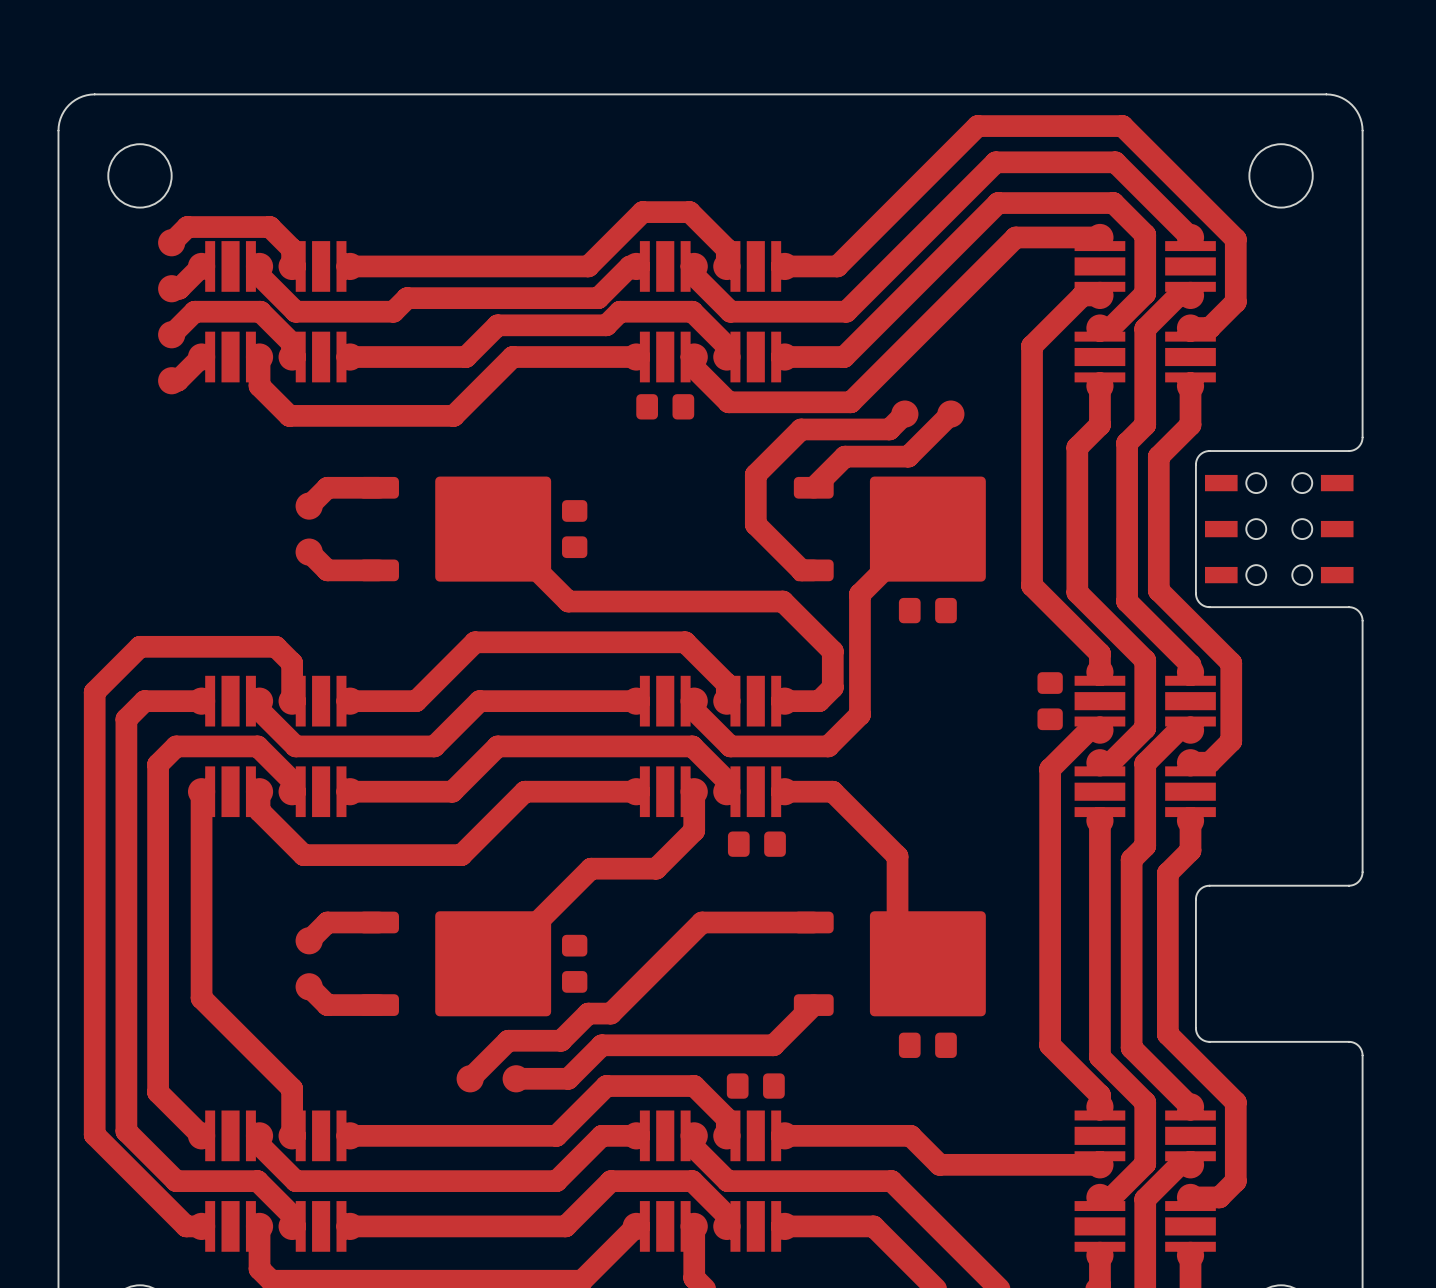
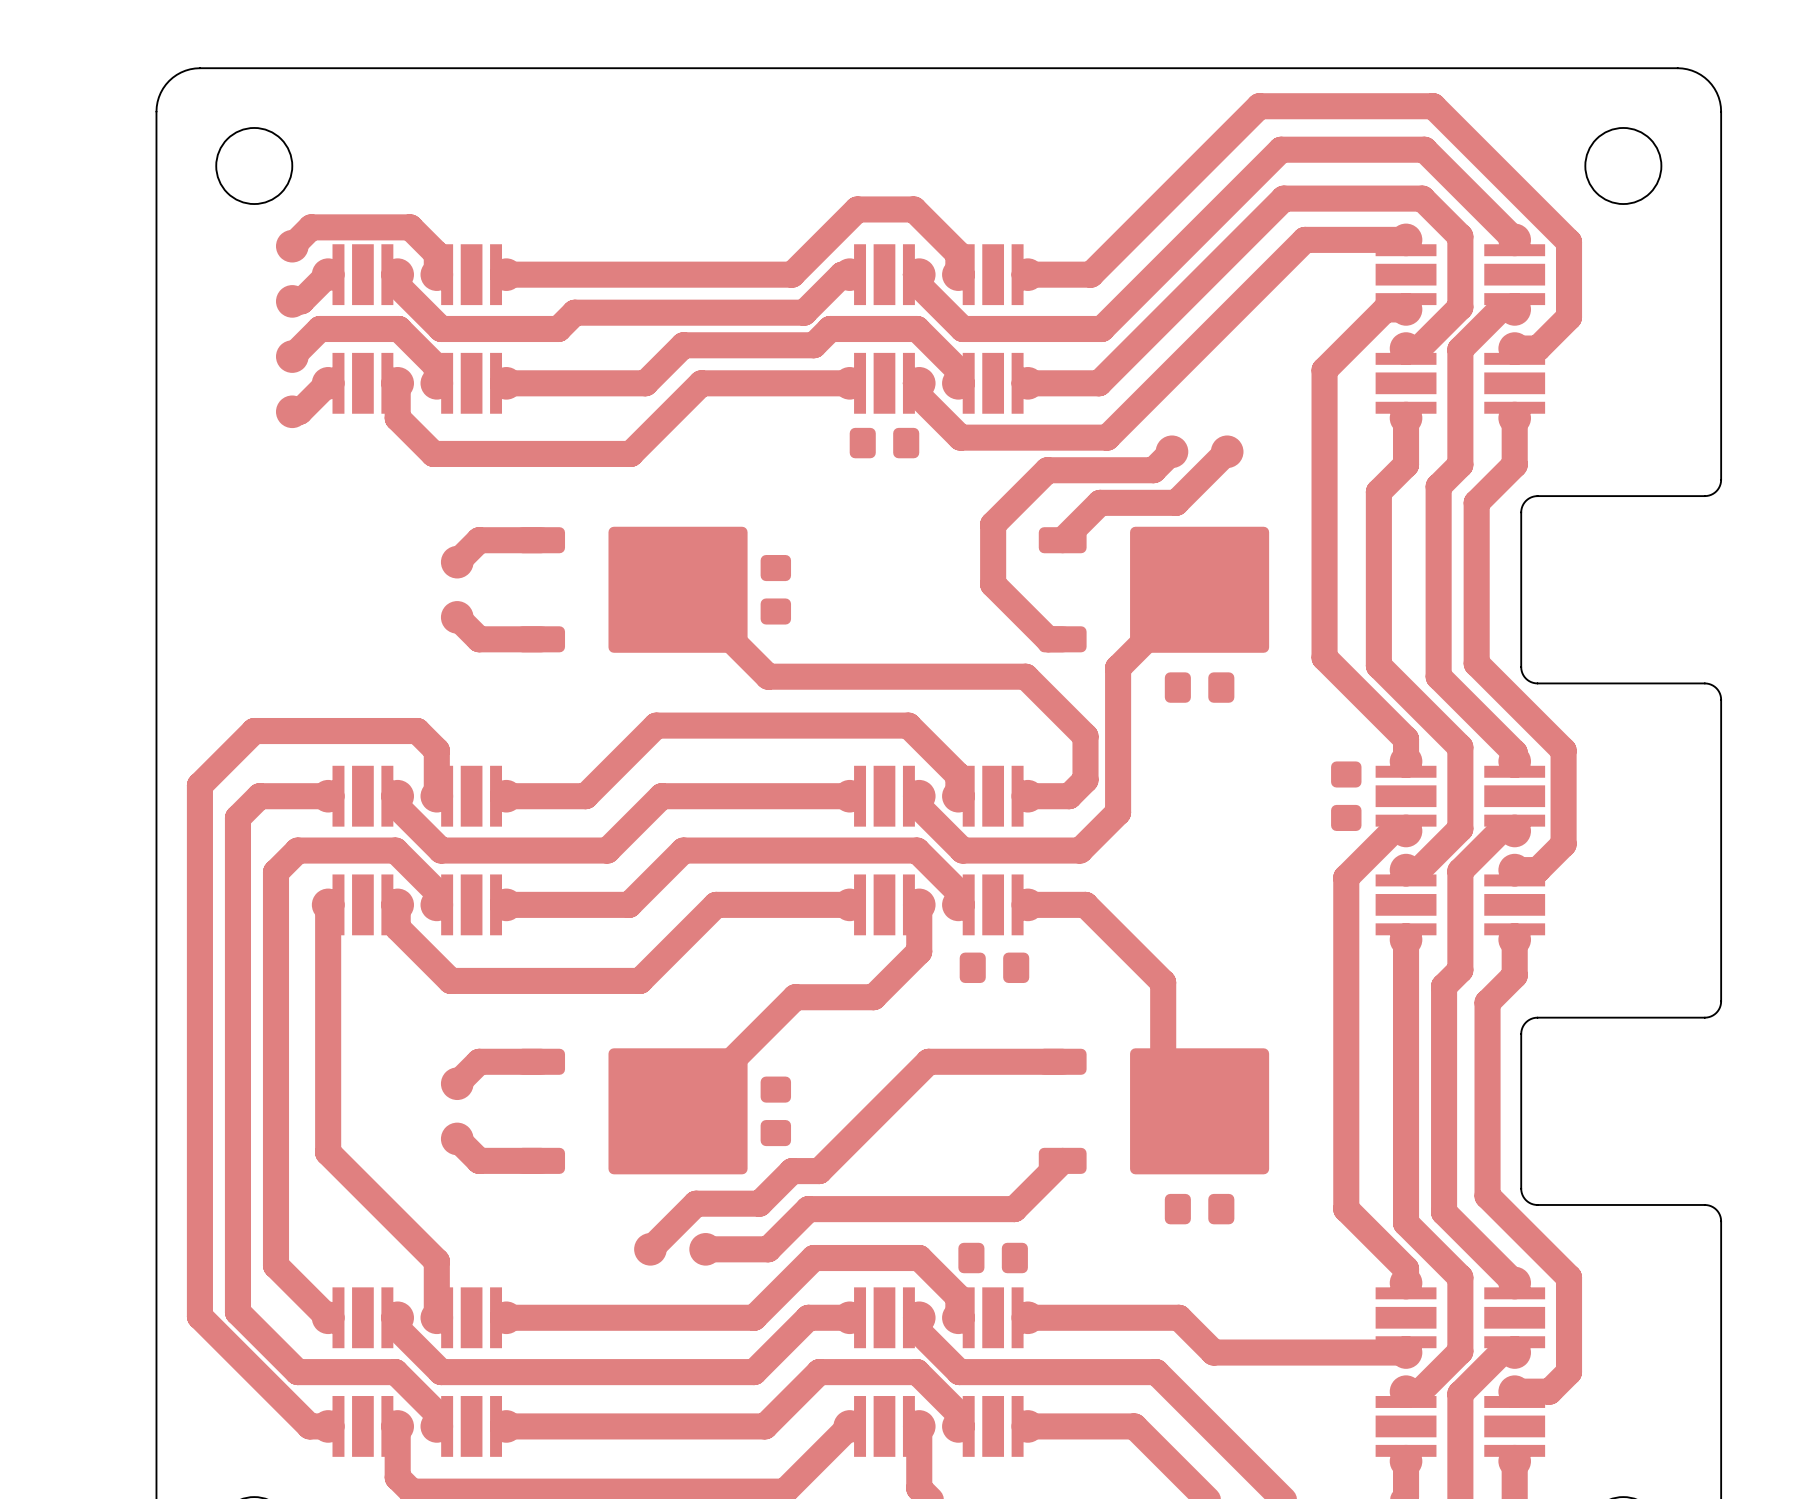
part: (1279, 529) -> none

